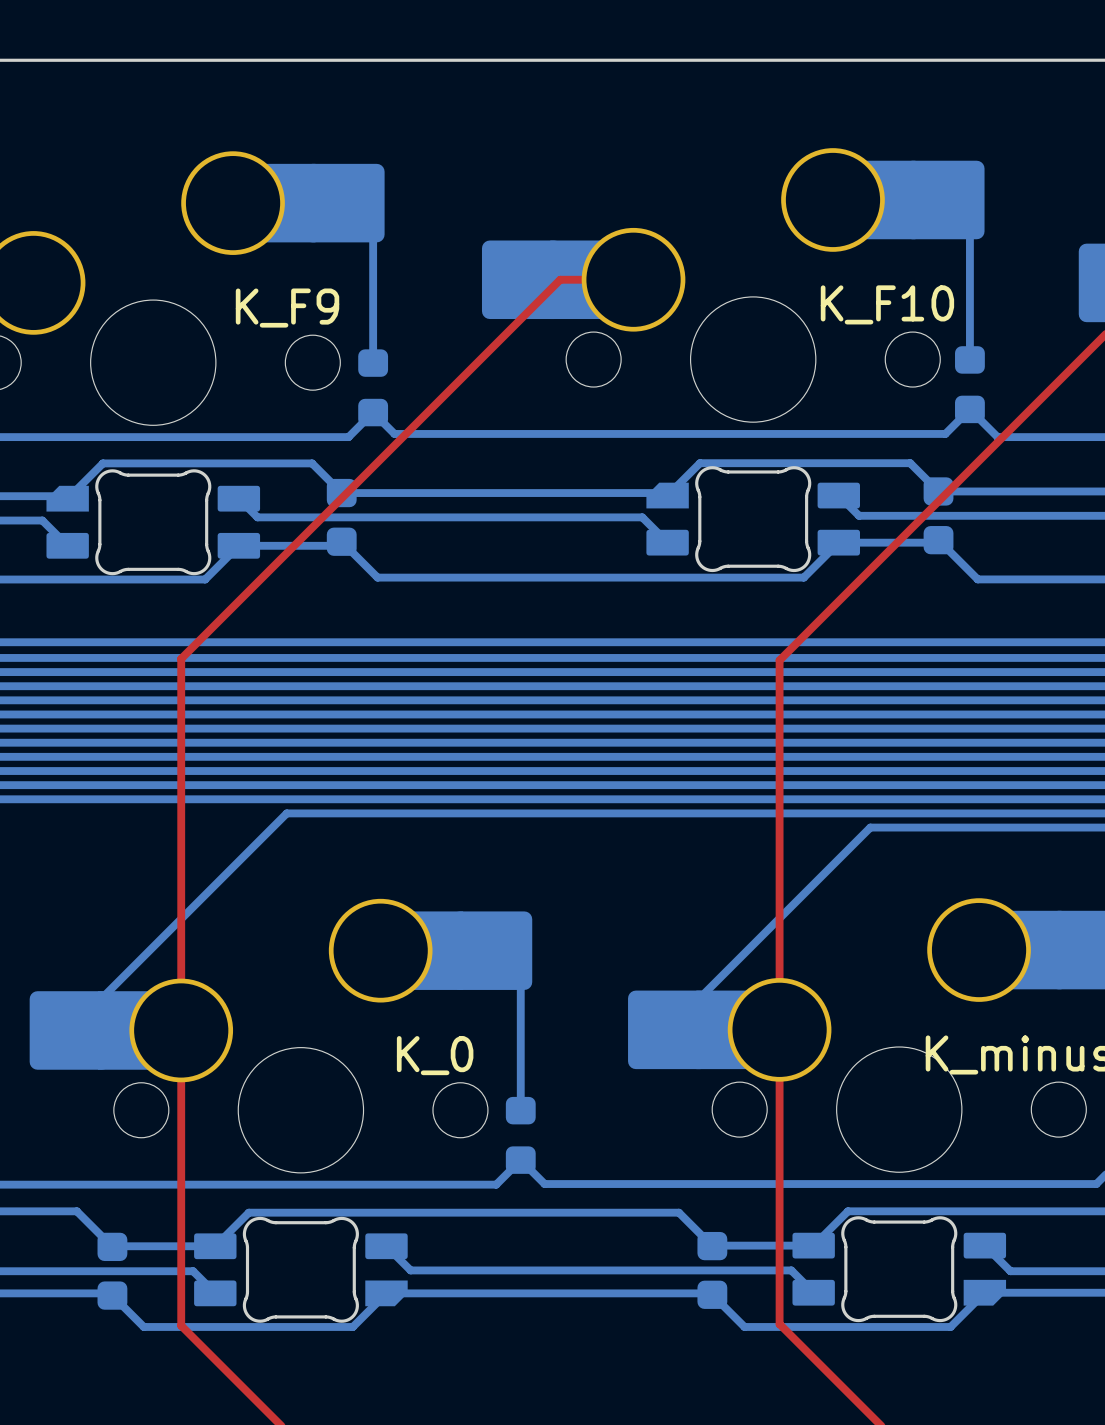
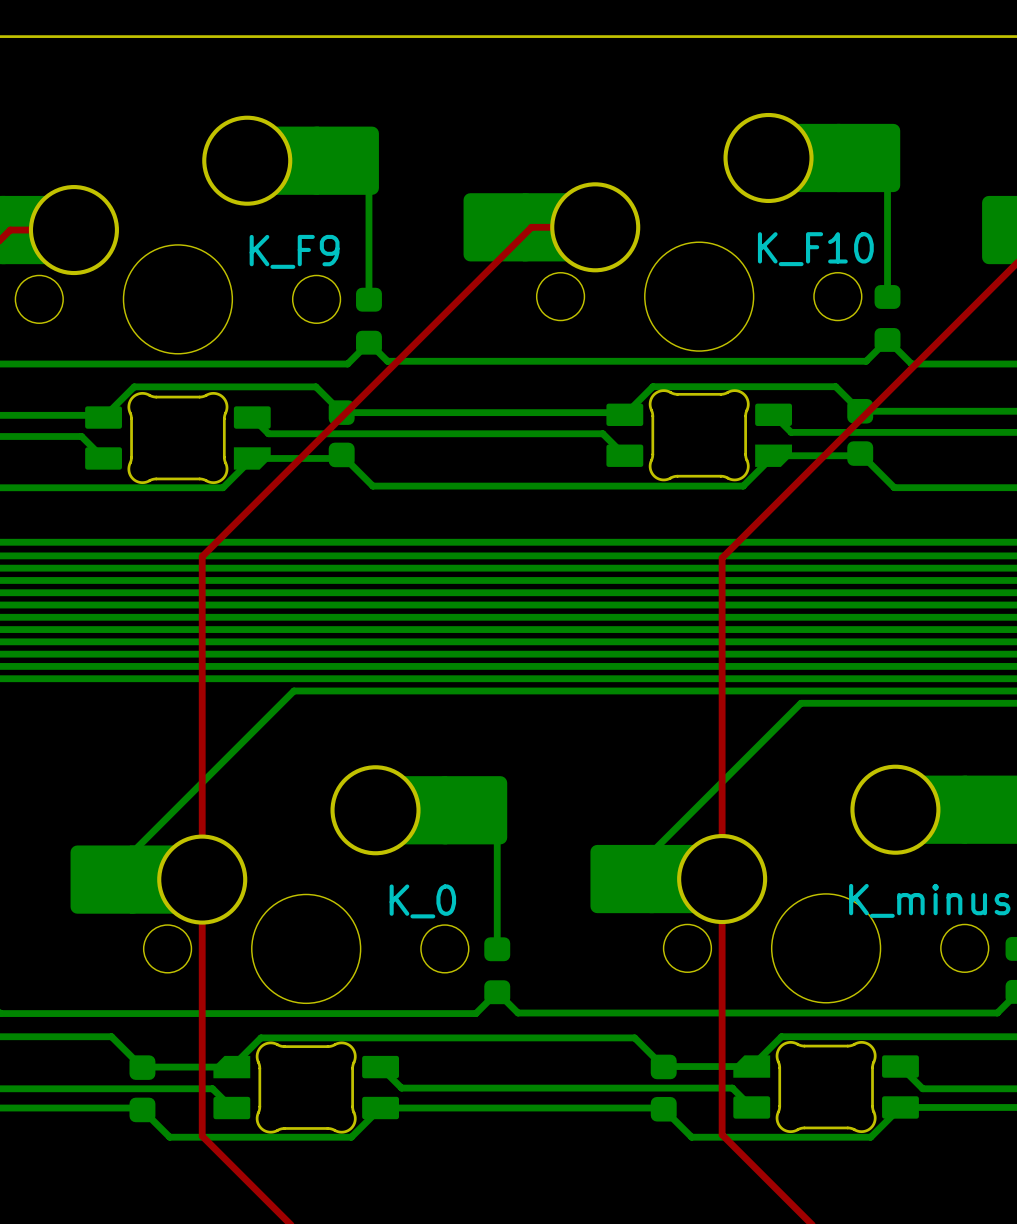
part rotation: 0° (753, 519) -> 180° (699, 435)
part rotation: 0° (153, 522) -> 180° (177, 438)
part rotation: 0° (300, 1269) -> 180° (306, 1087)
part rotation: 0° (899, 1269) -> 180° (826, 1087)

